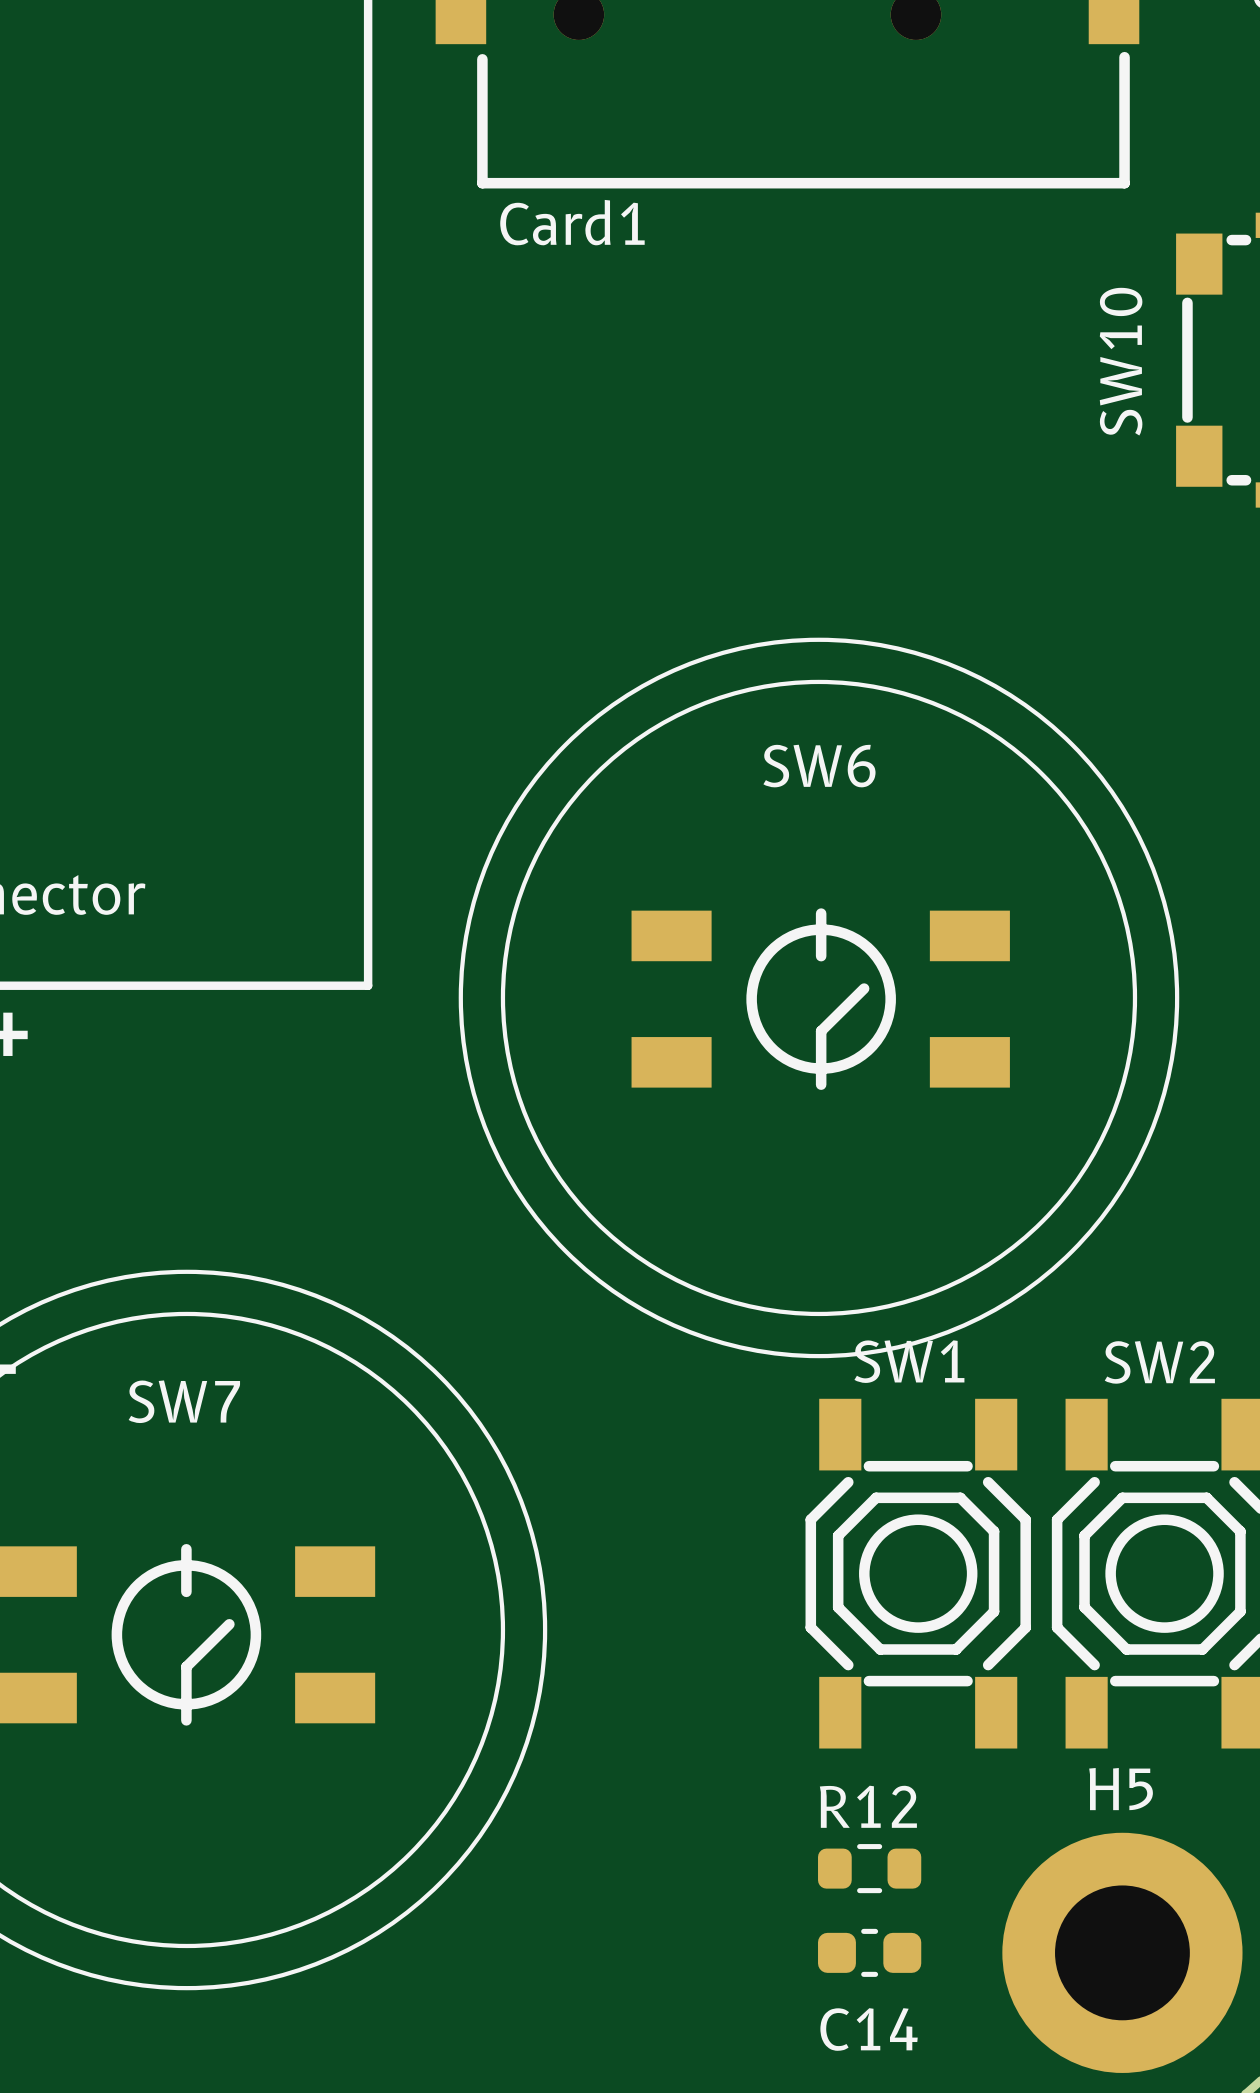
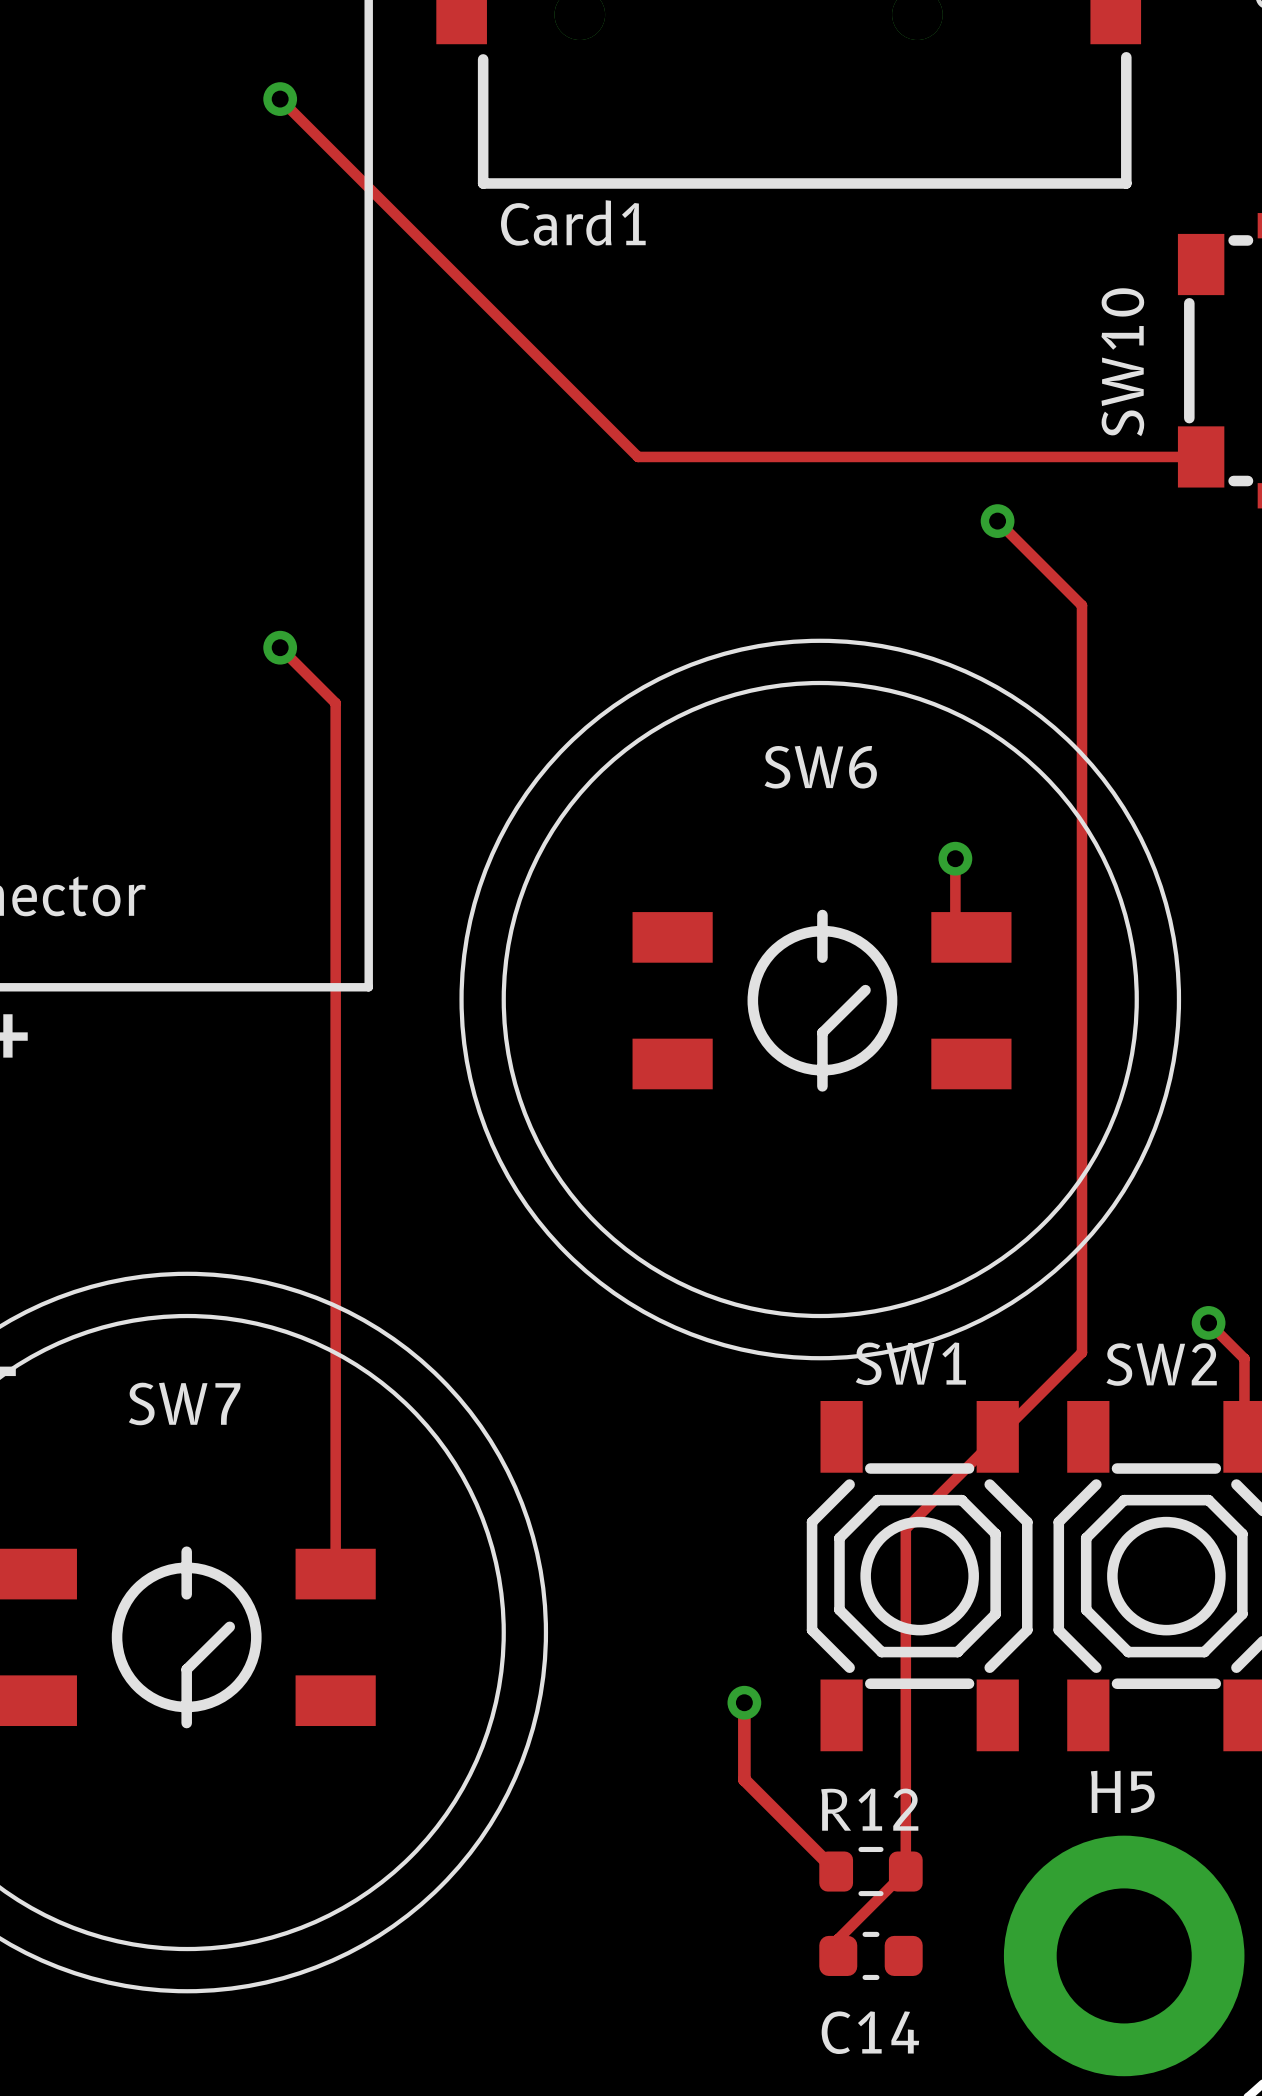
track: none -> (280, 99) (638, 456) (1201, 456)
via: none -> (280, 99)
track: none -> (997, 521) (1081, 605) (1081, 1352) (905, 1528) (905, 1871) (838, 1939) (838, 1955)
via: none -> (997, 521)
track: none -> (280, 647) (335, 703) (335, 1574)
via: none -> (280, 647)
track: none -> (955, 858) (955, 921) (971, 937)
via: none -> (955, 858)
track: none -> (1208, 1322) (1244, 1358) (1244, 1436)
via: none -> (1208, 1322)
track: none -> (744, 1702) (744, 1779) (836, 1871)
via: none -> (744, 1702)

